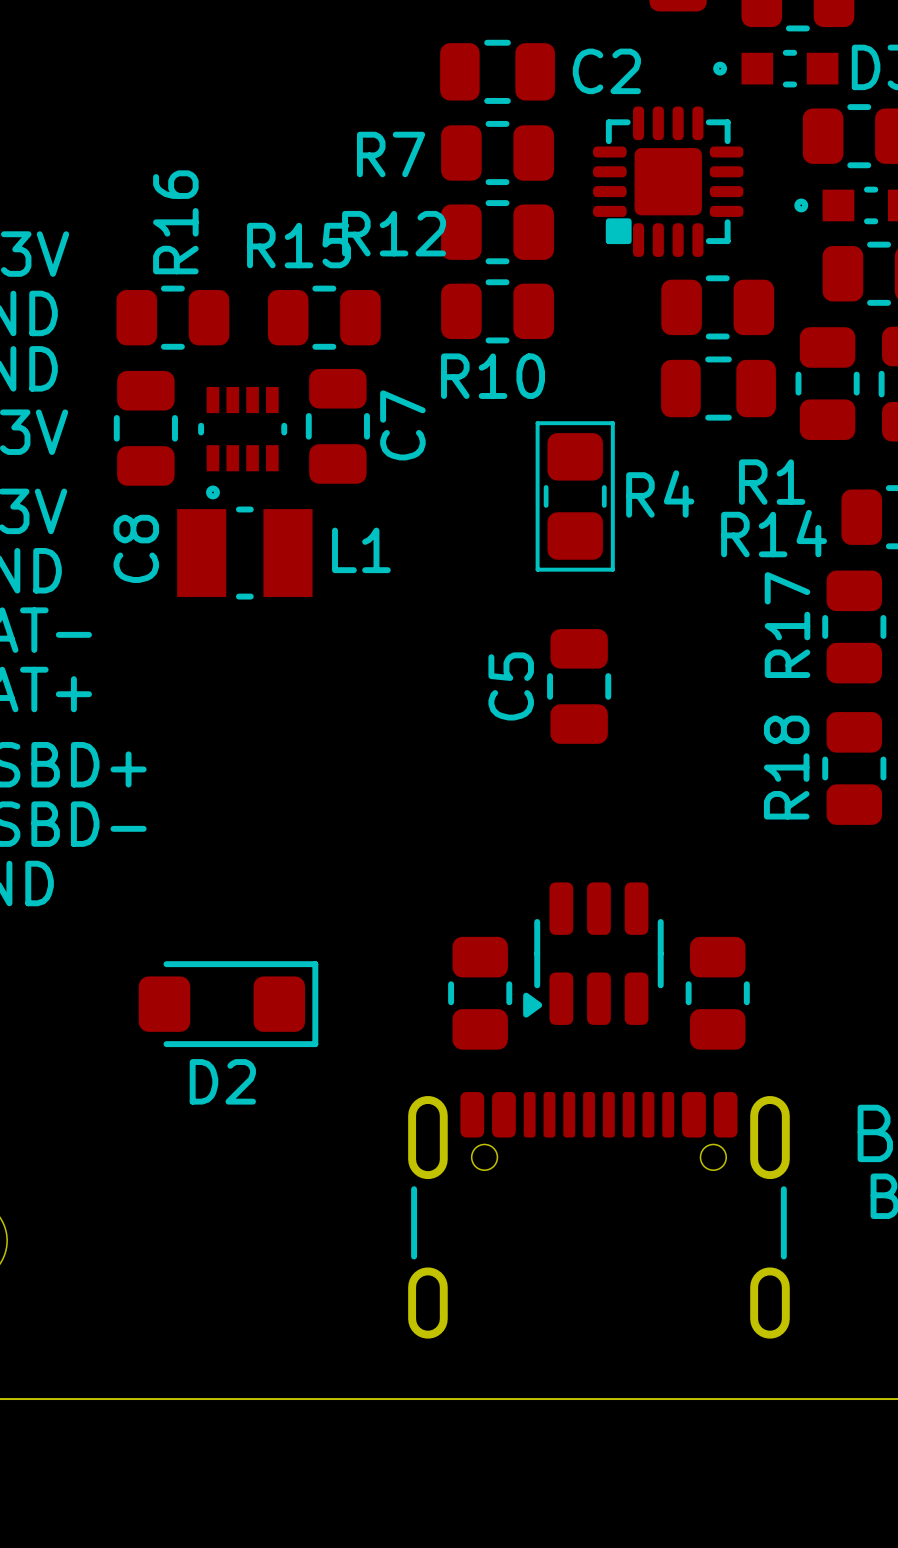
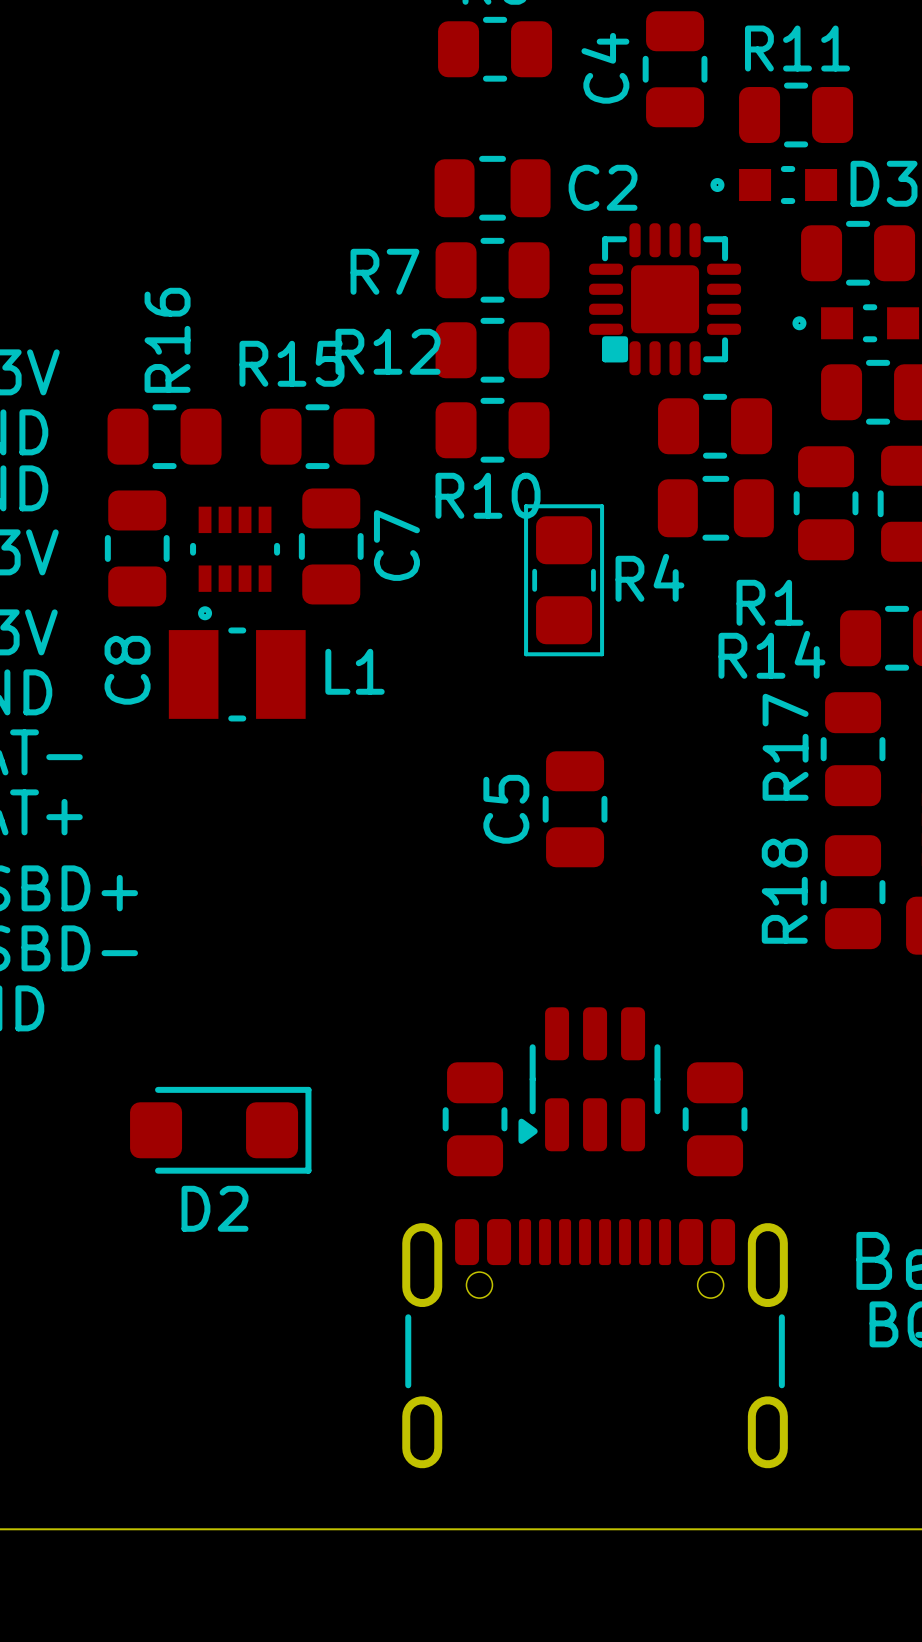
line: (537, 423) (612, 423) (612, 569) (537, 569) (537, 423) -> (526, 506) (526, 654) (602, 654) (602, 506) (526, 506)
R4 position: (575, 496) -> (564, 580)

